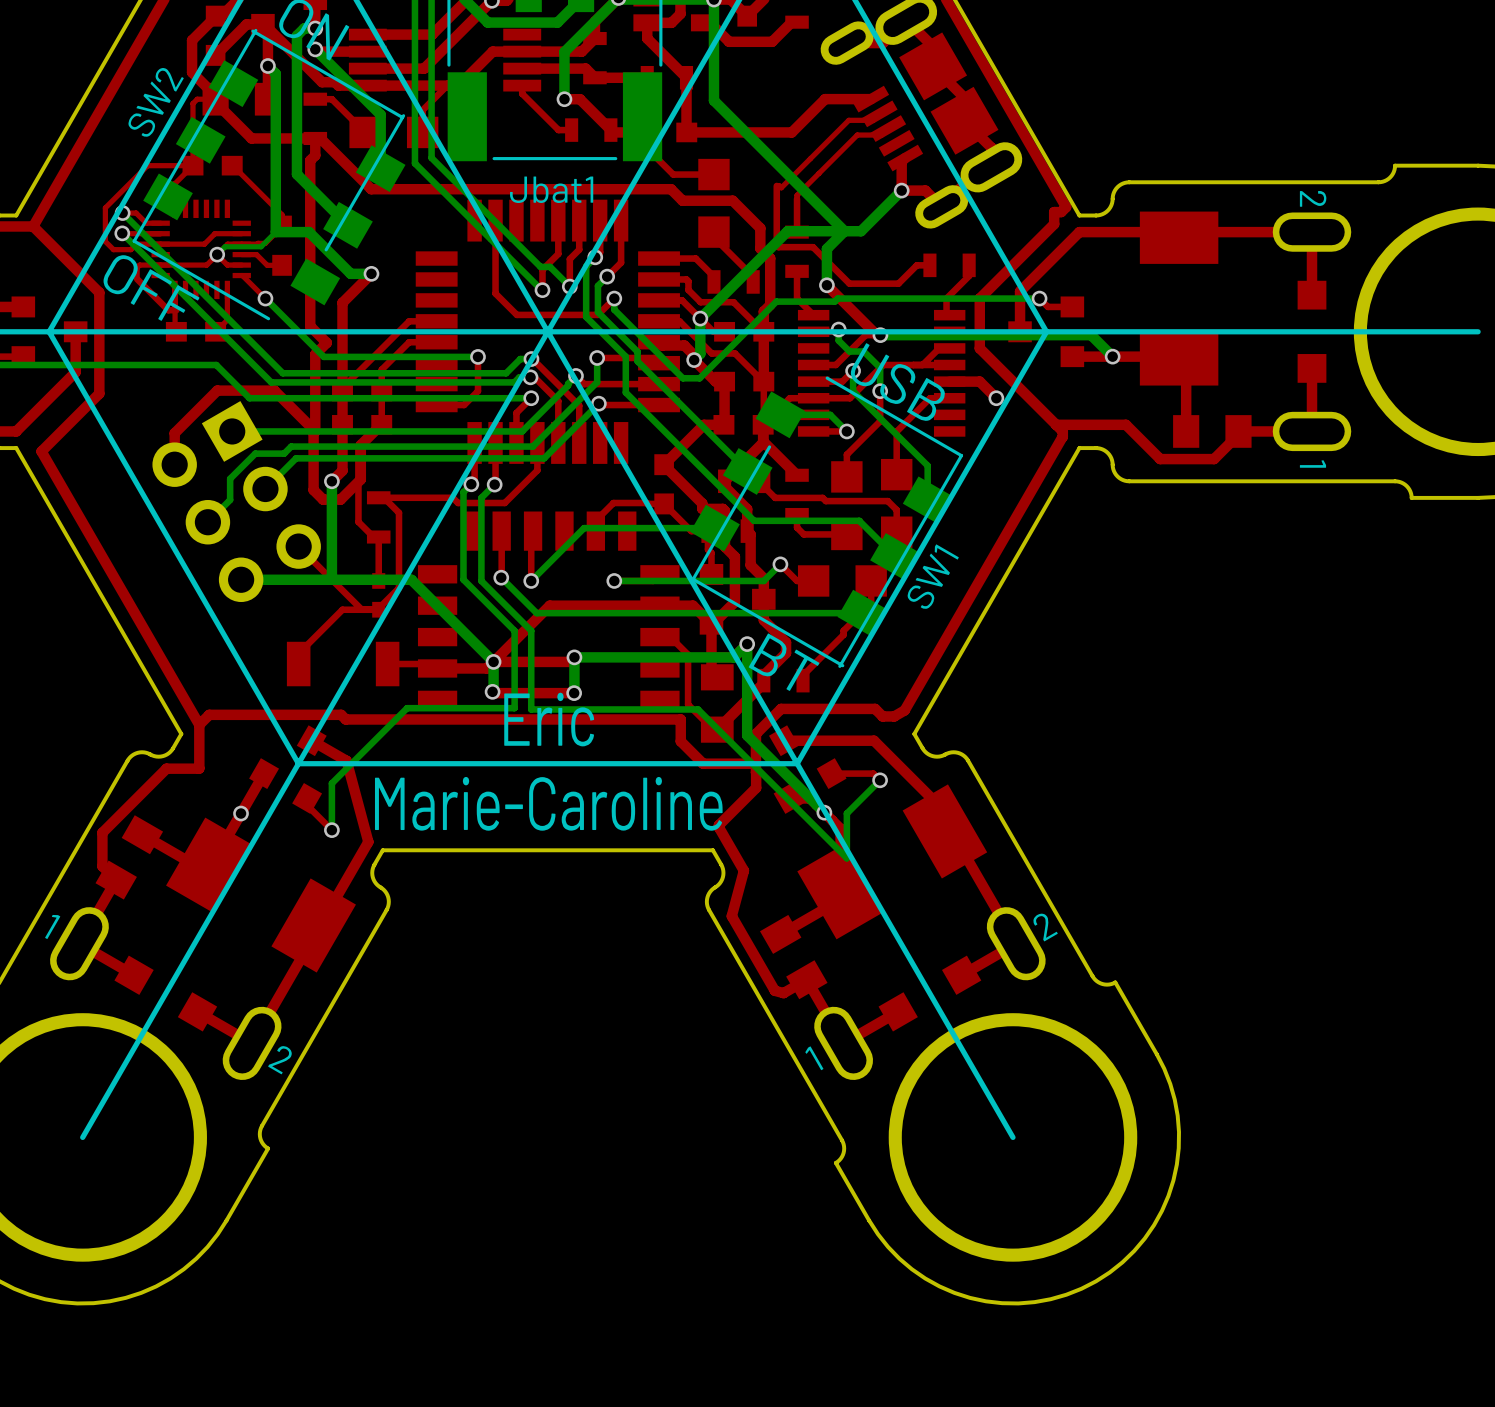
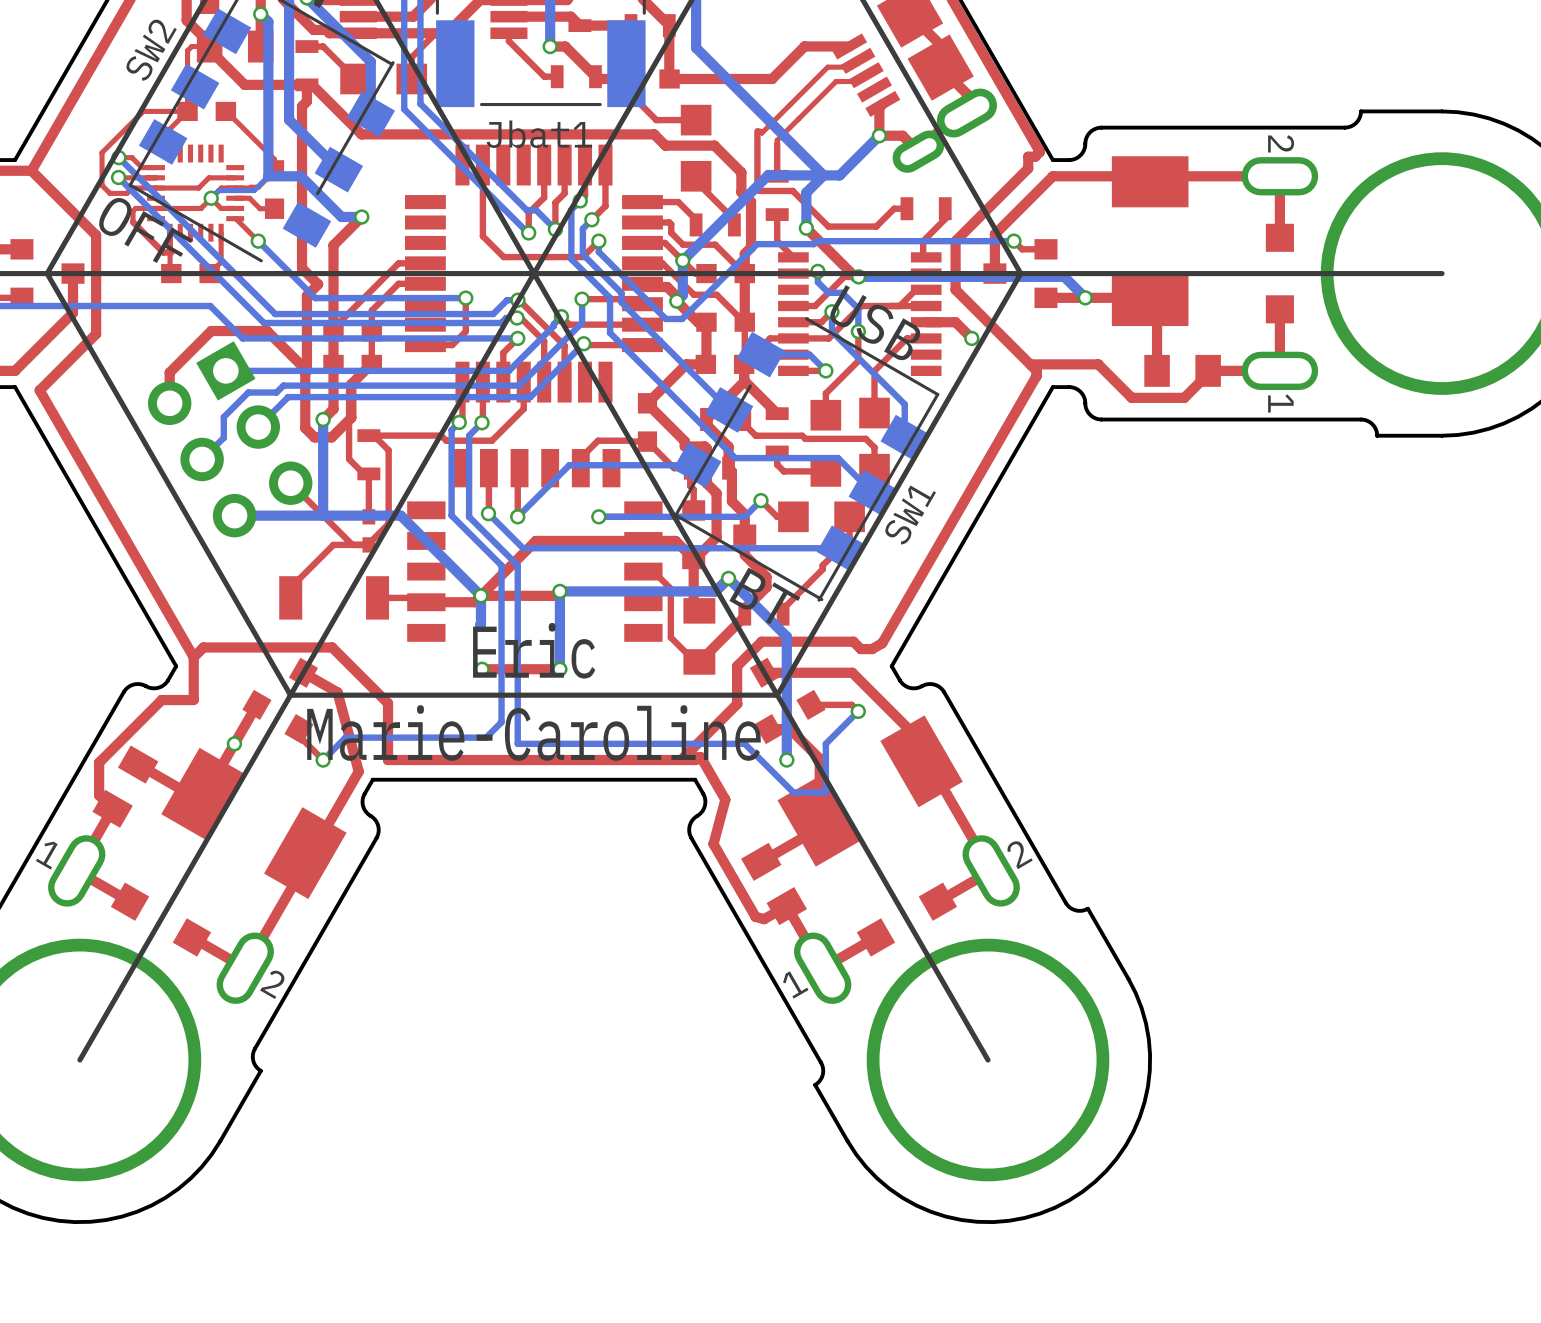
bottom track: (747, 644) (747, 735) (824, 812) -> (728, 578) (786, 636) (786, 760)
top track: (492, 691) (574, 693) -> none
via: (492, 691) -> none
bottom track: none -> (559, 626) (559, 669)
via position: (574, 693) -> (559, 669)
bottom track: (514, 708) (407, 708) (331, 783) (331, 830) -> (501, 640) (501, 722) (486, 737) (345, 737) (323, 760)
bottom track: (531, 709) (698, 709) (846, 858) -> (517, 642) (517, 743) (744, 743) (793, 792) (825, 792) (825, 787)
top track: (345, 719) (680, 719) (680, 741) (703, 763) (755, 763) -> (336, 652) (388, 703) (388, 760) (696, 760)
via: none -> (482, 669)
top track: none -> (559, 669) (482, 669)
top track: (755, 772) (756, 787) (718, 827) -> (737, 703) (683, 757) (700, 757)
via position: (824, 812) -> (786, 760)

